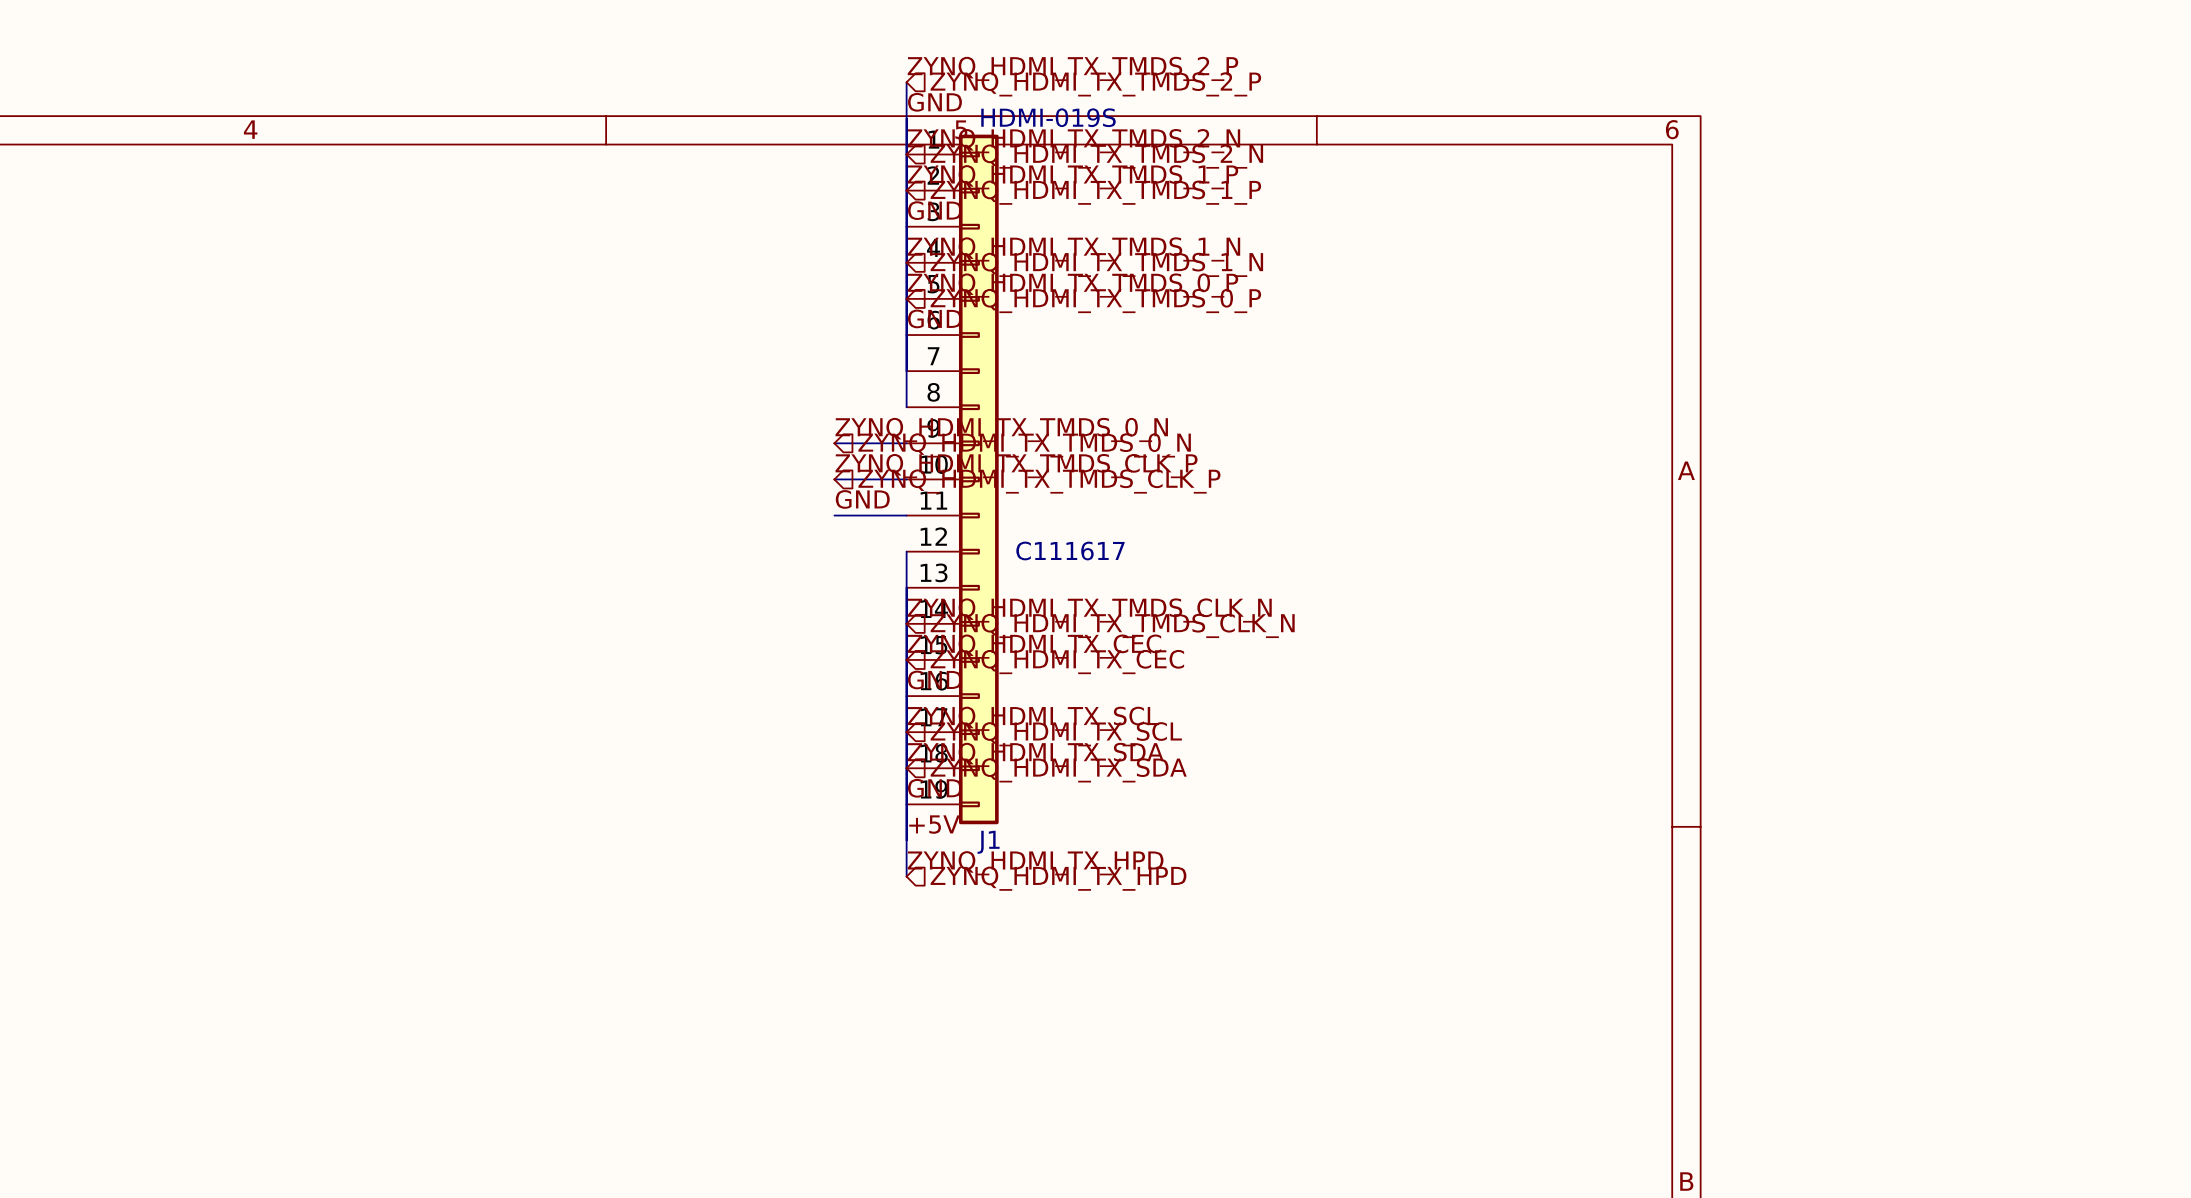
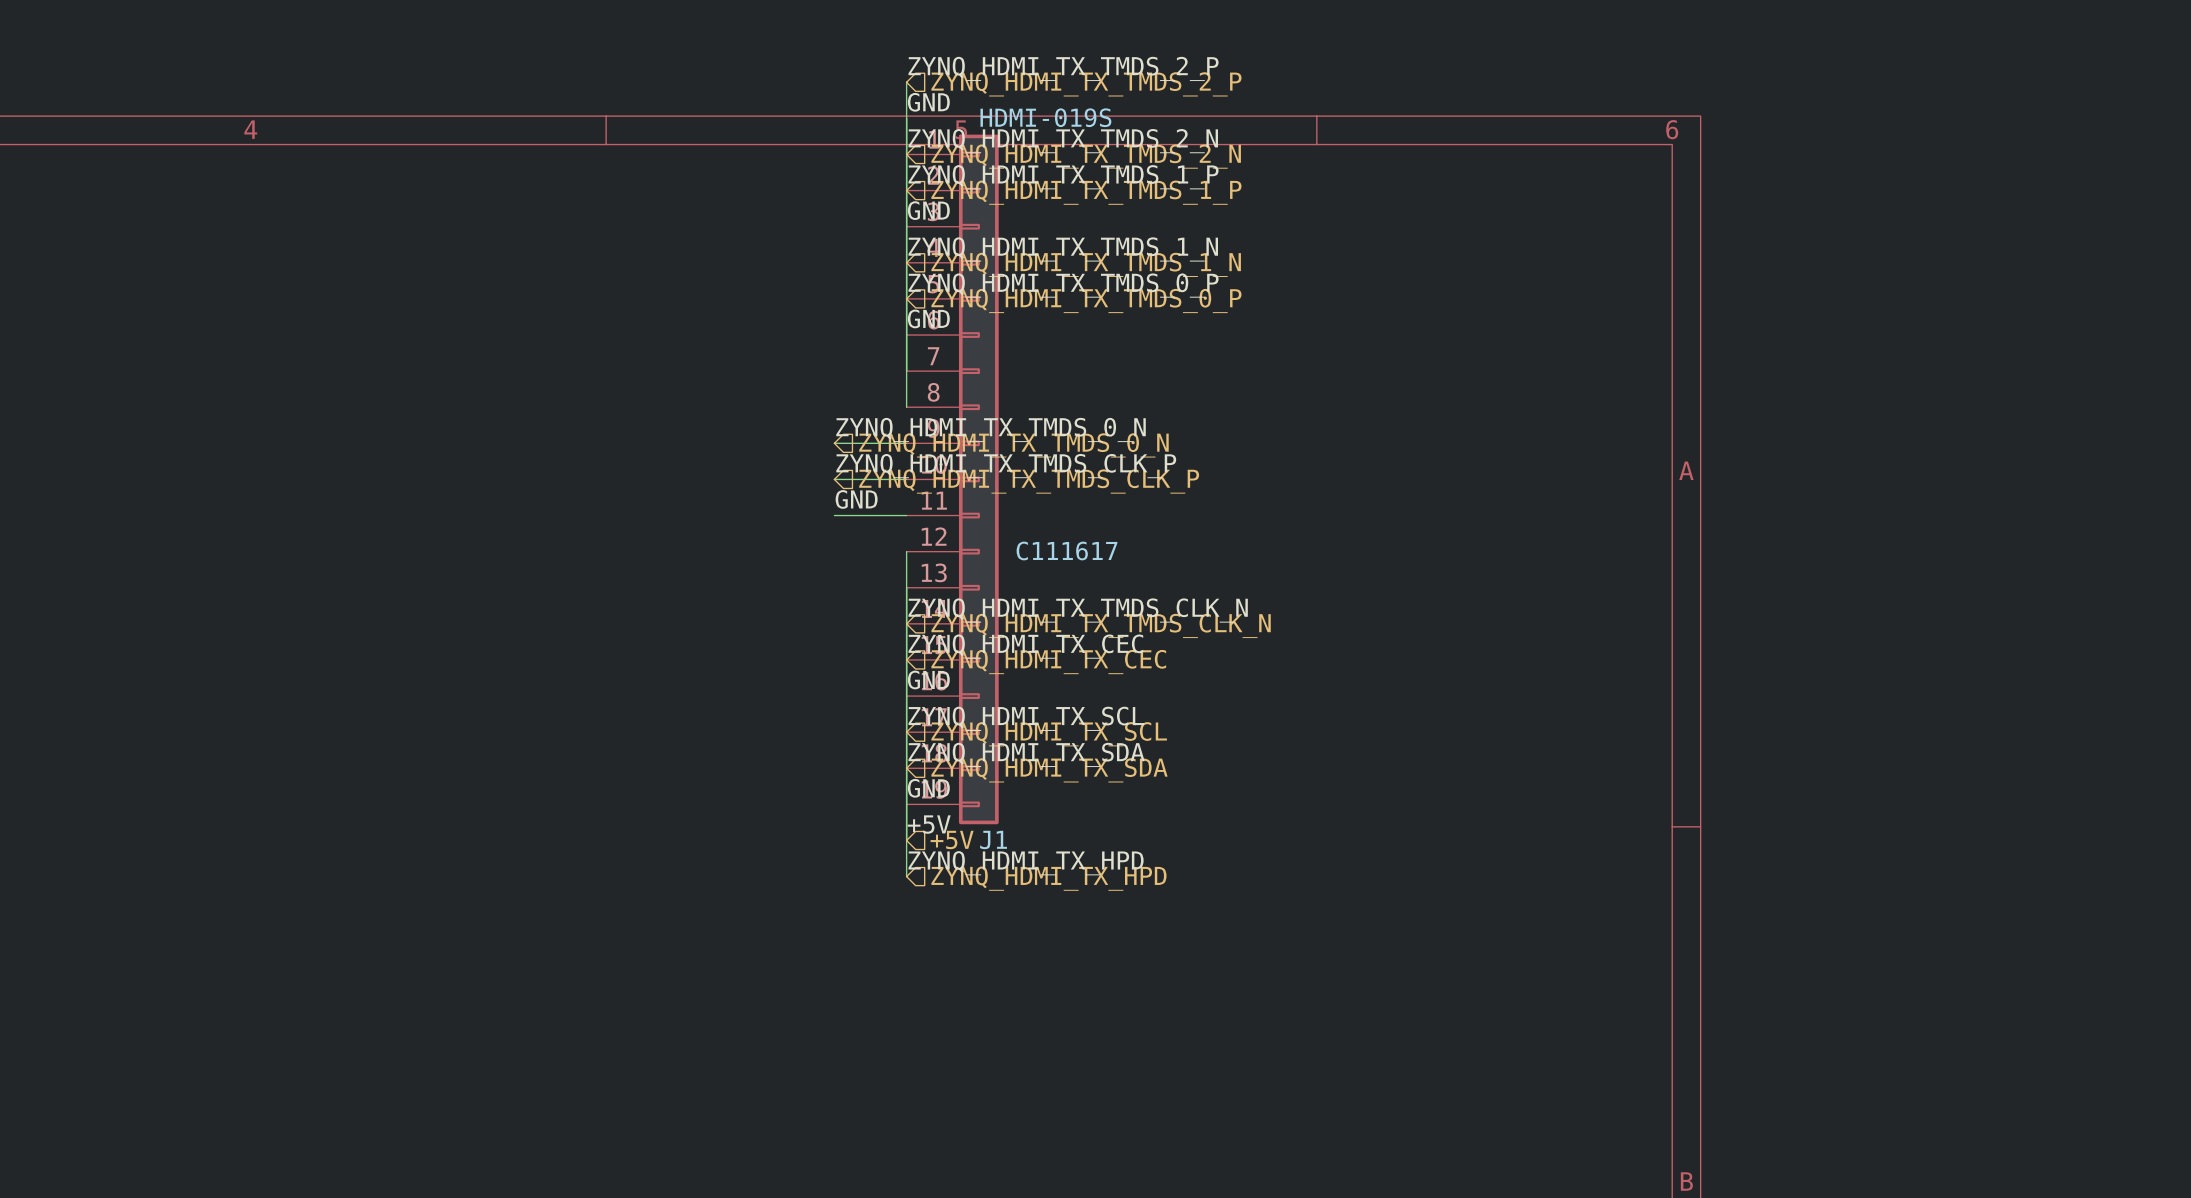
hierarchical label: none -> +5V (952, 839)

